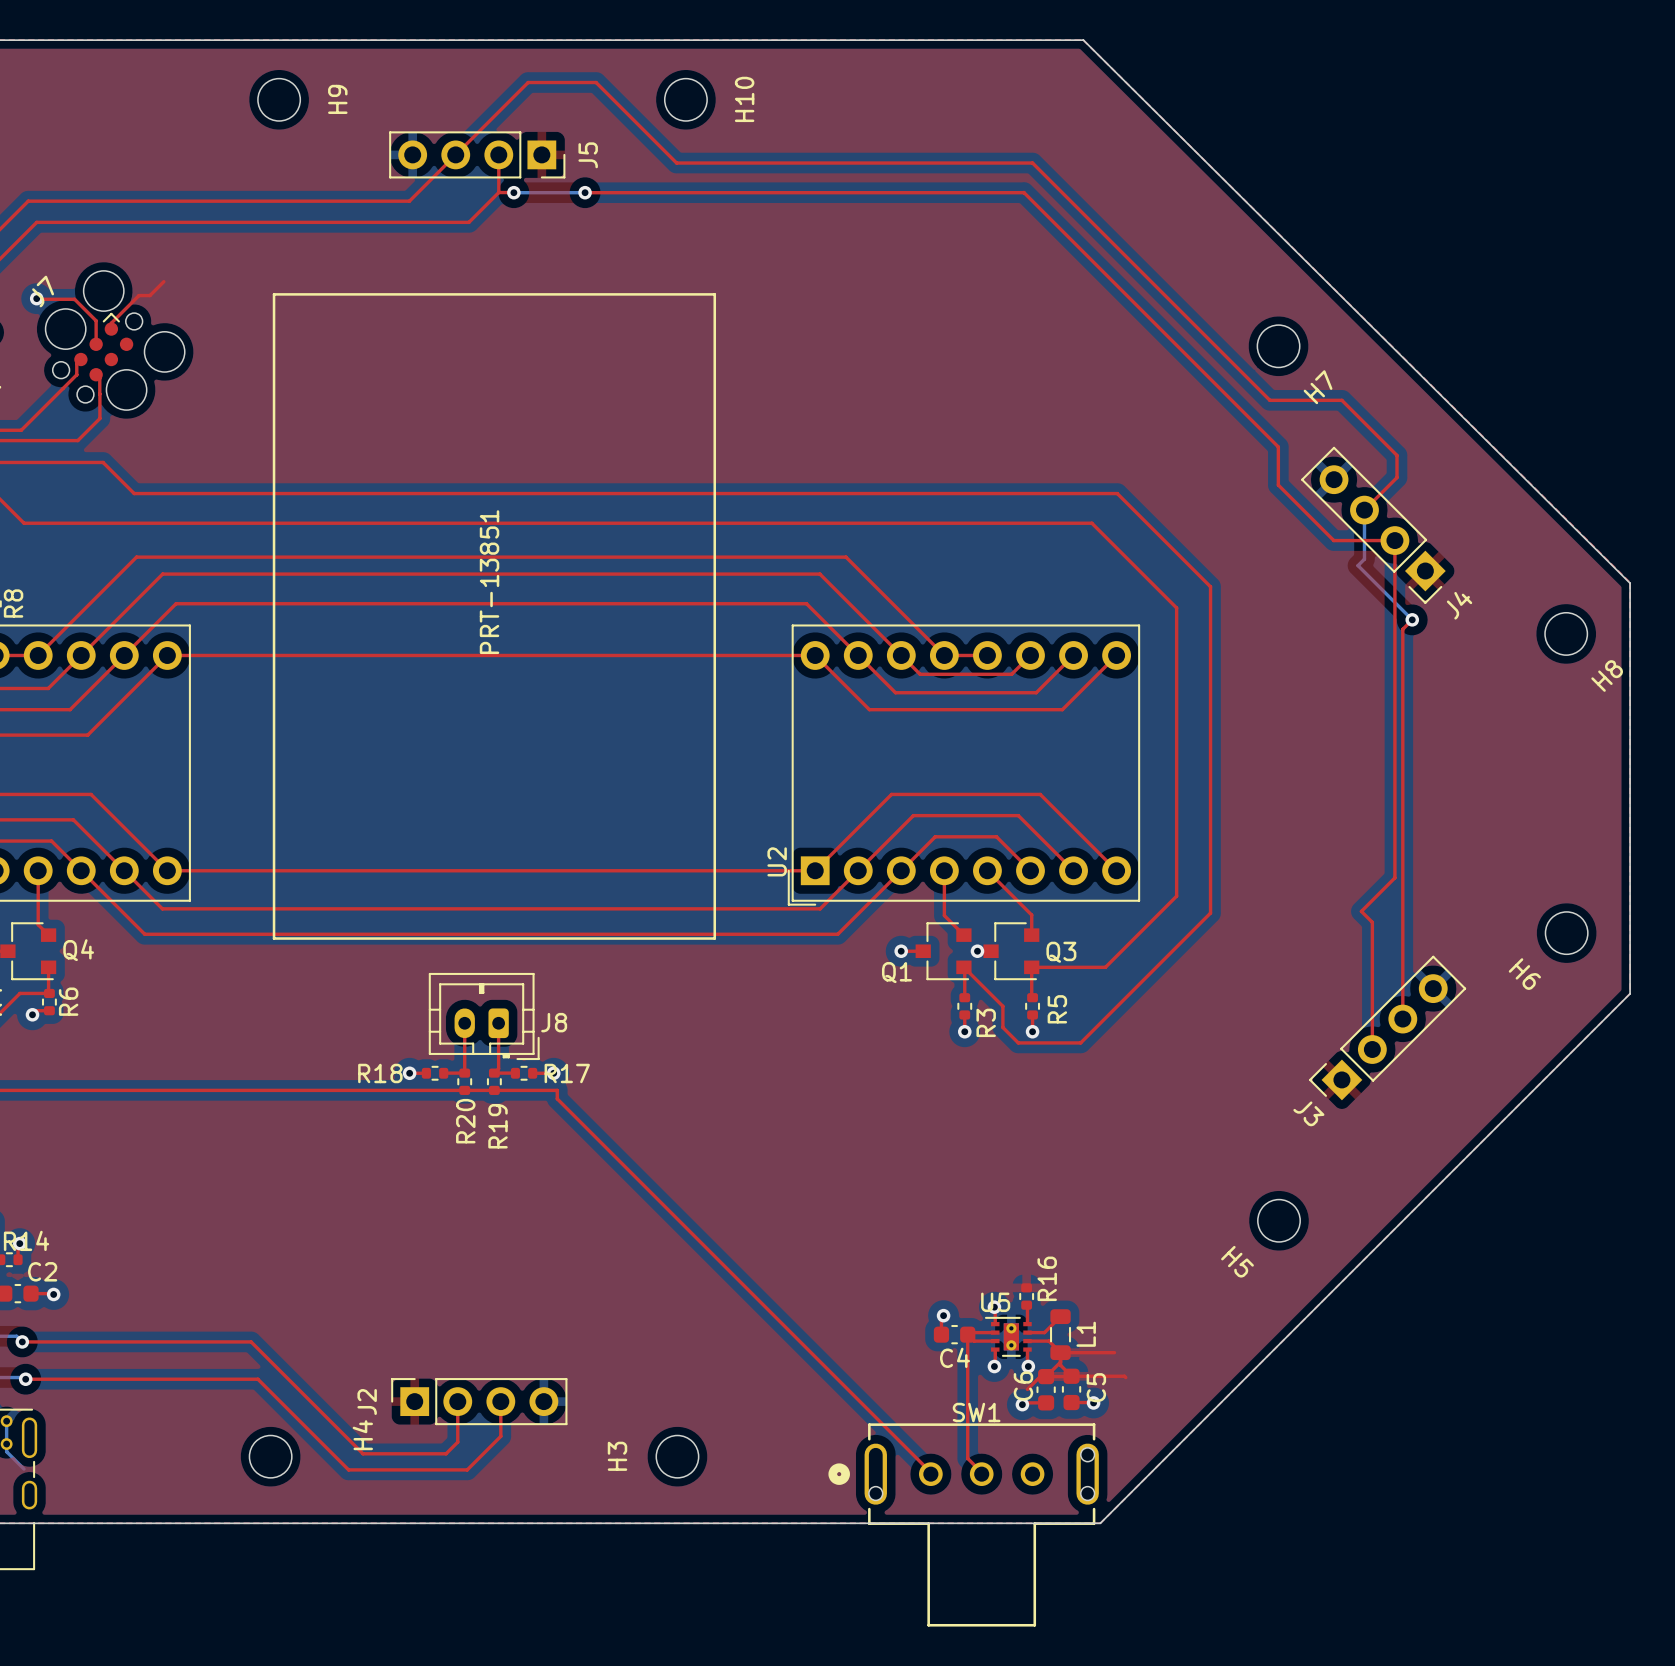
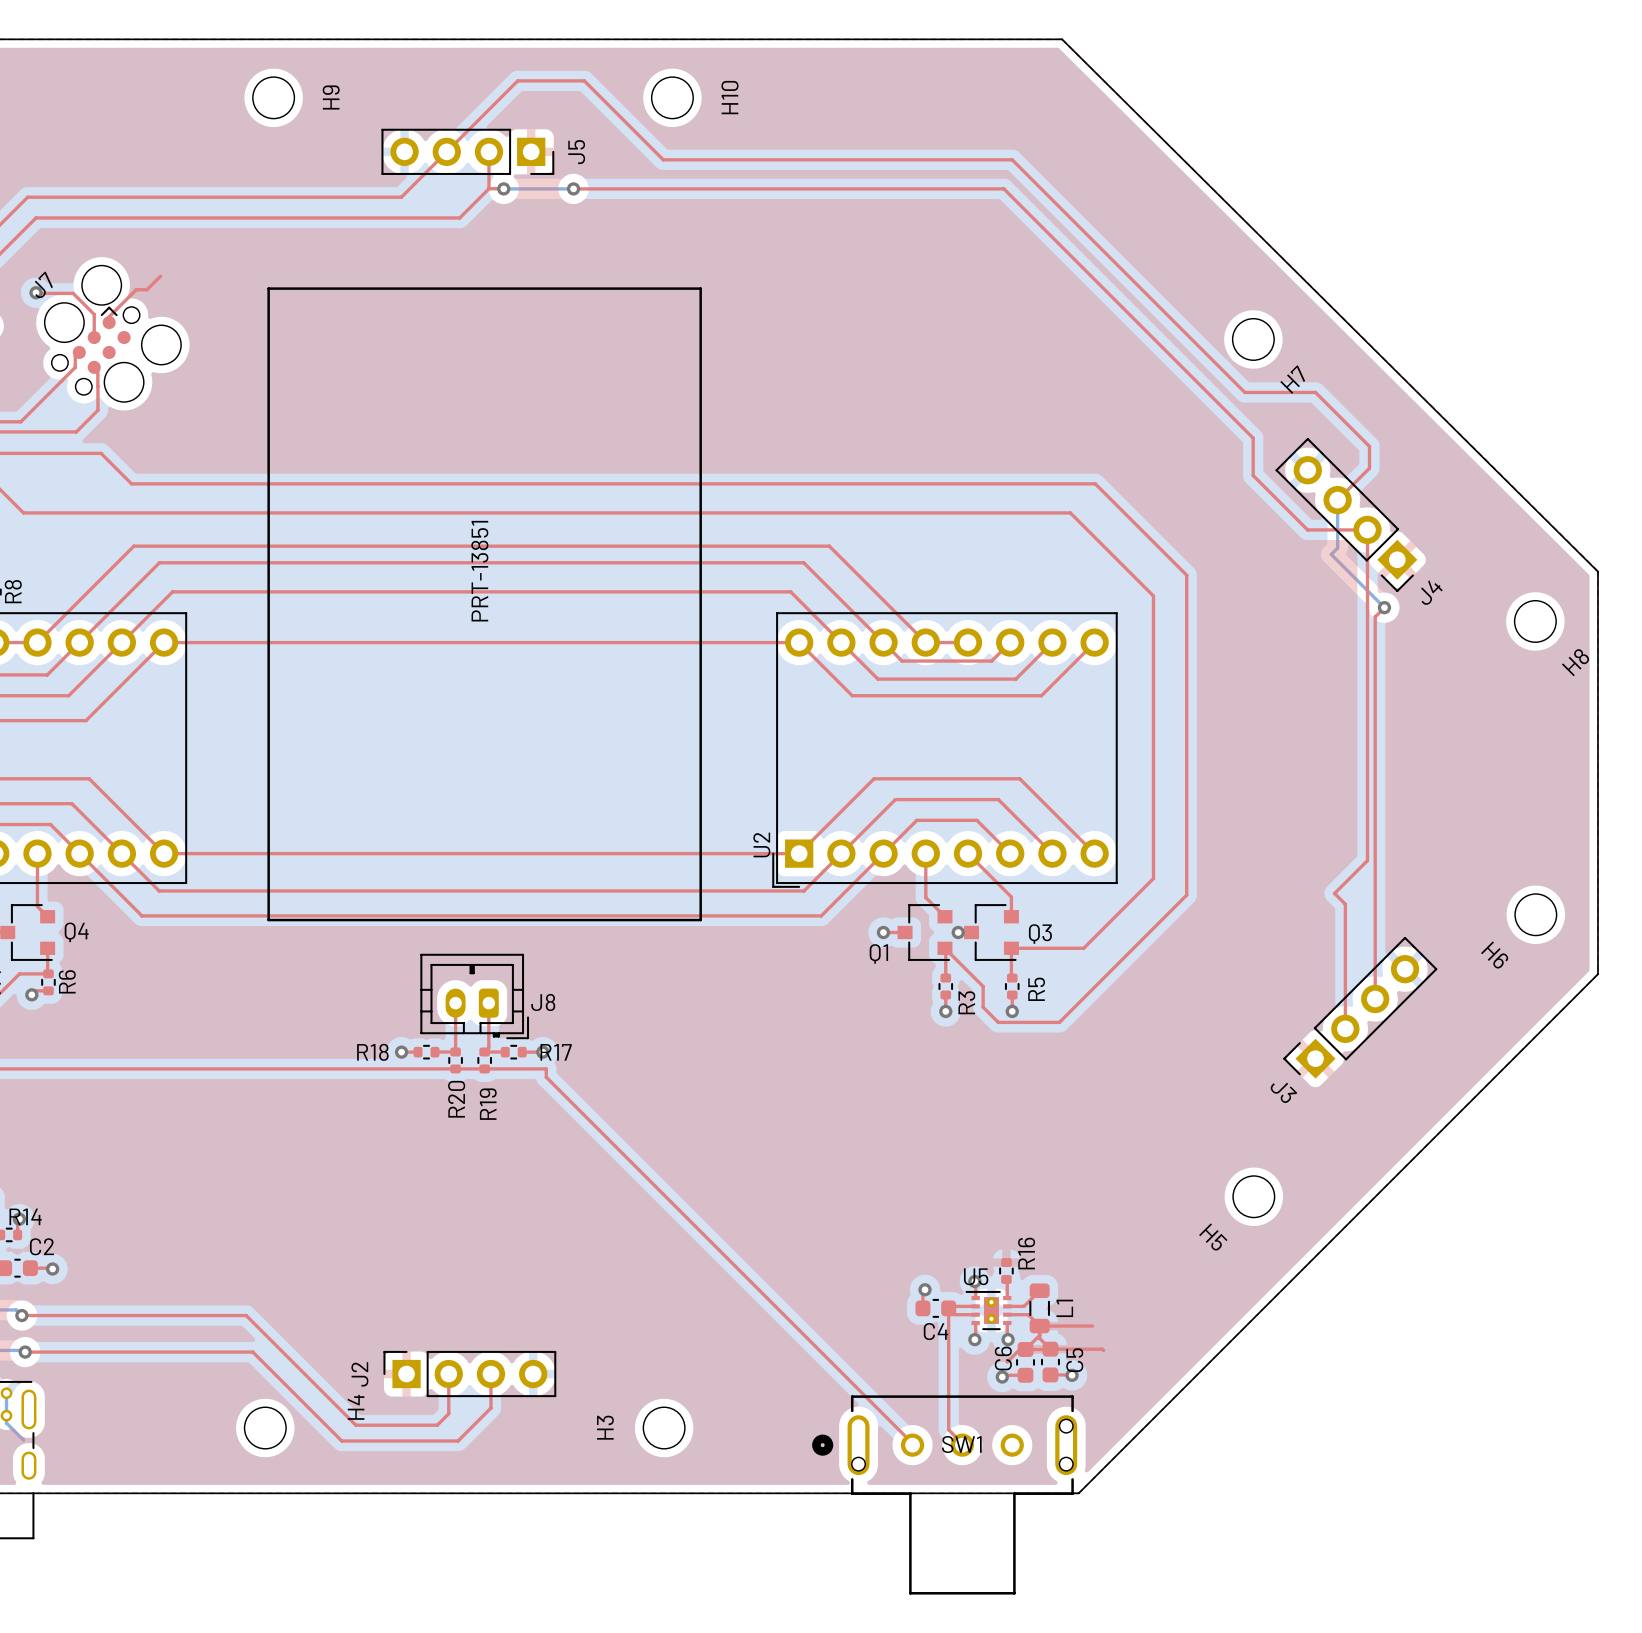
SW1 name position: SW1 (976, 1412) -> SW1 (961, 1444)

